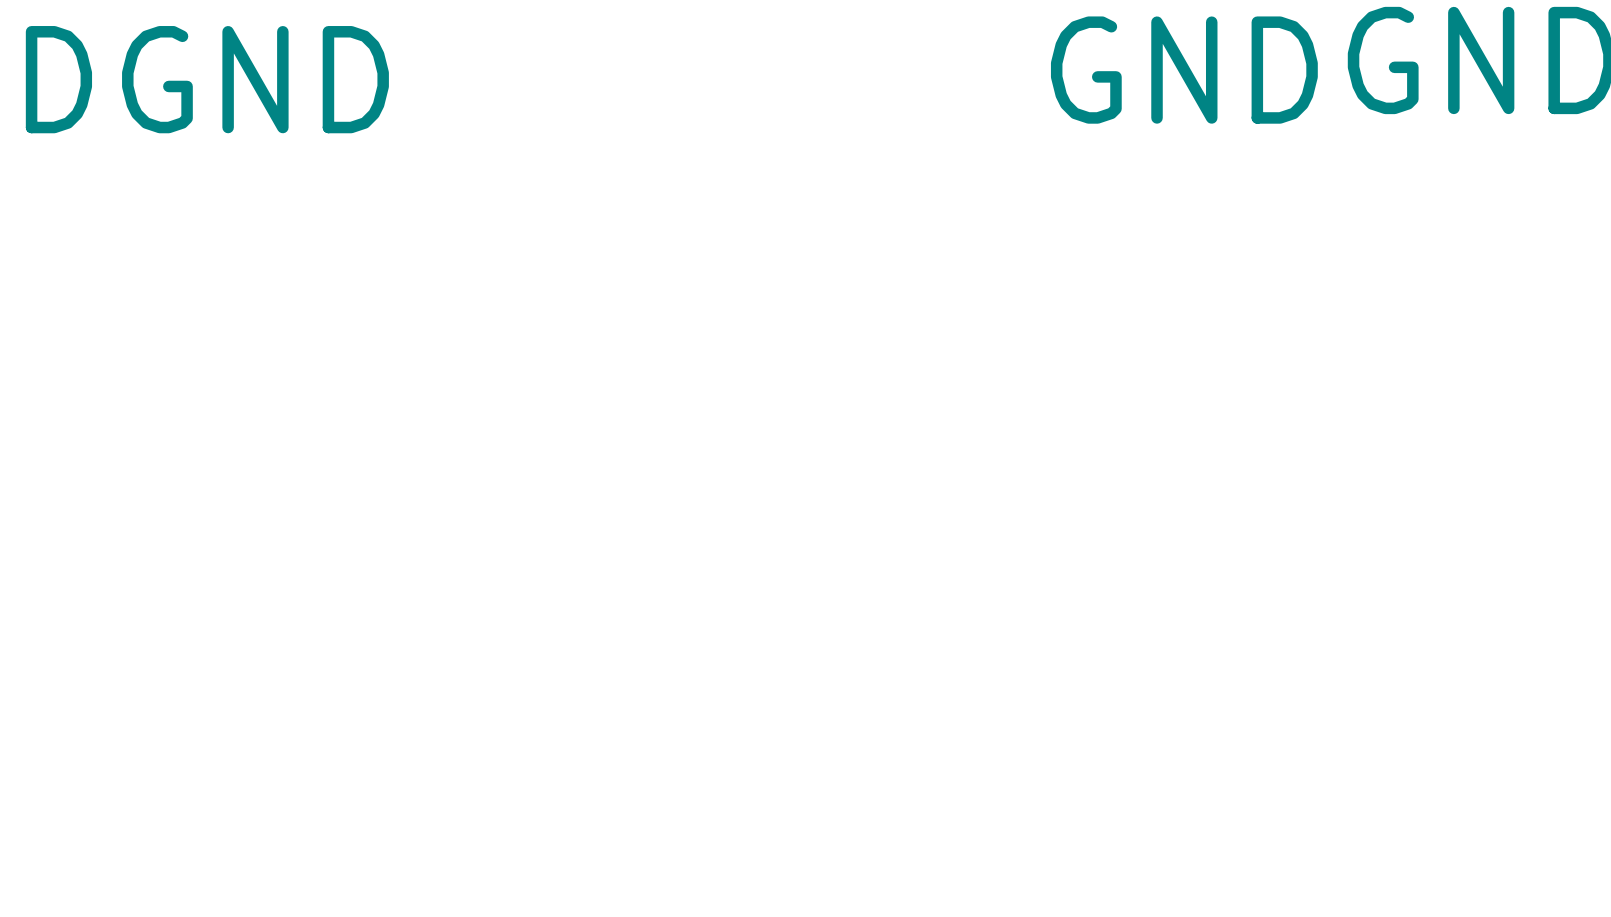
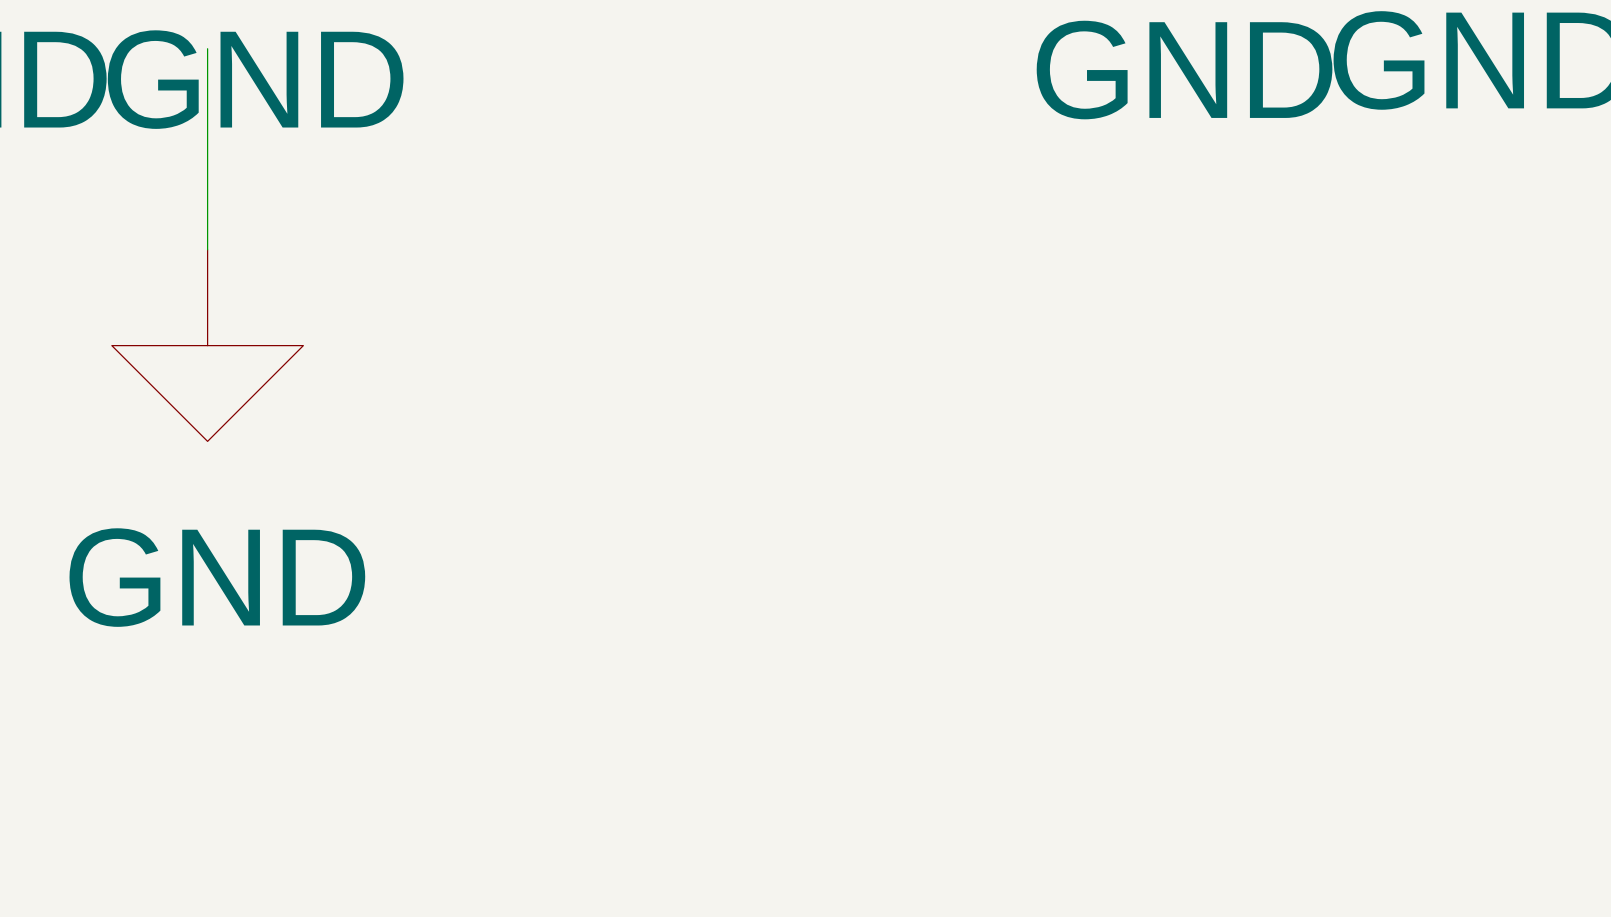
wire: none -> (207, 48) (207, 249)
power symbol: none -> GND (207, 345)

